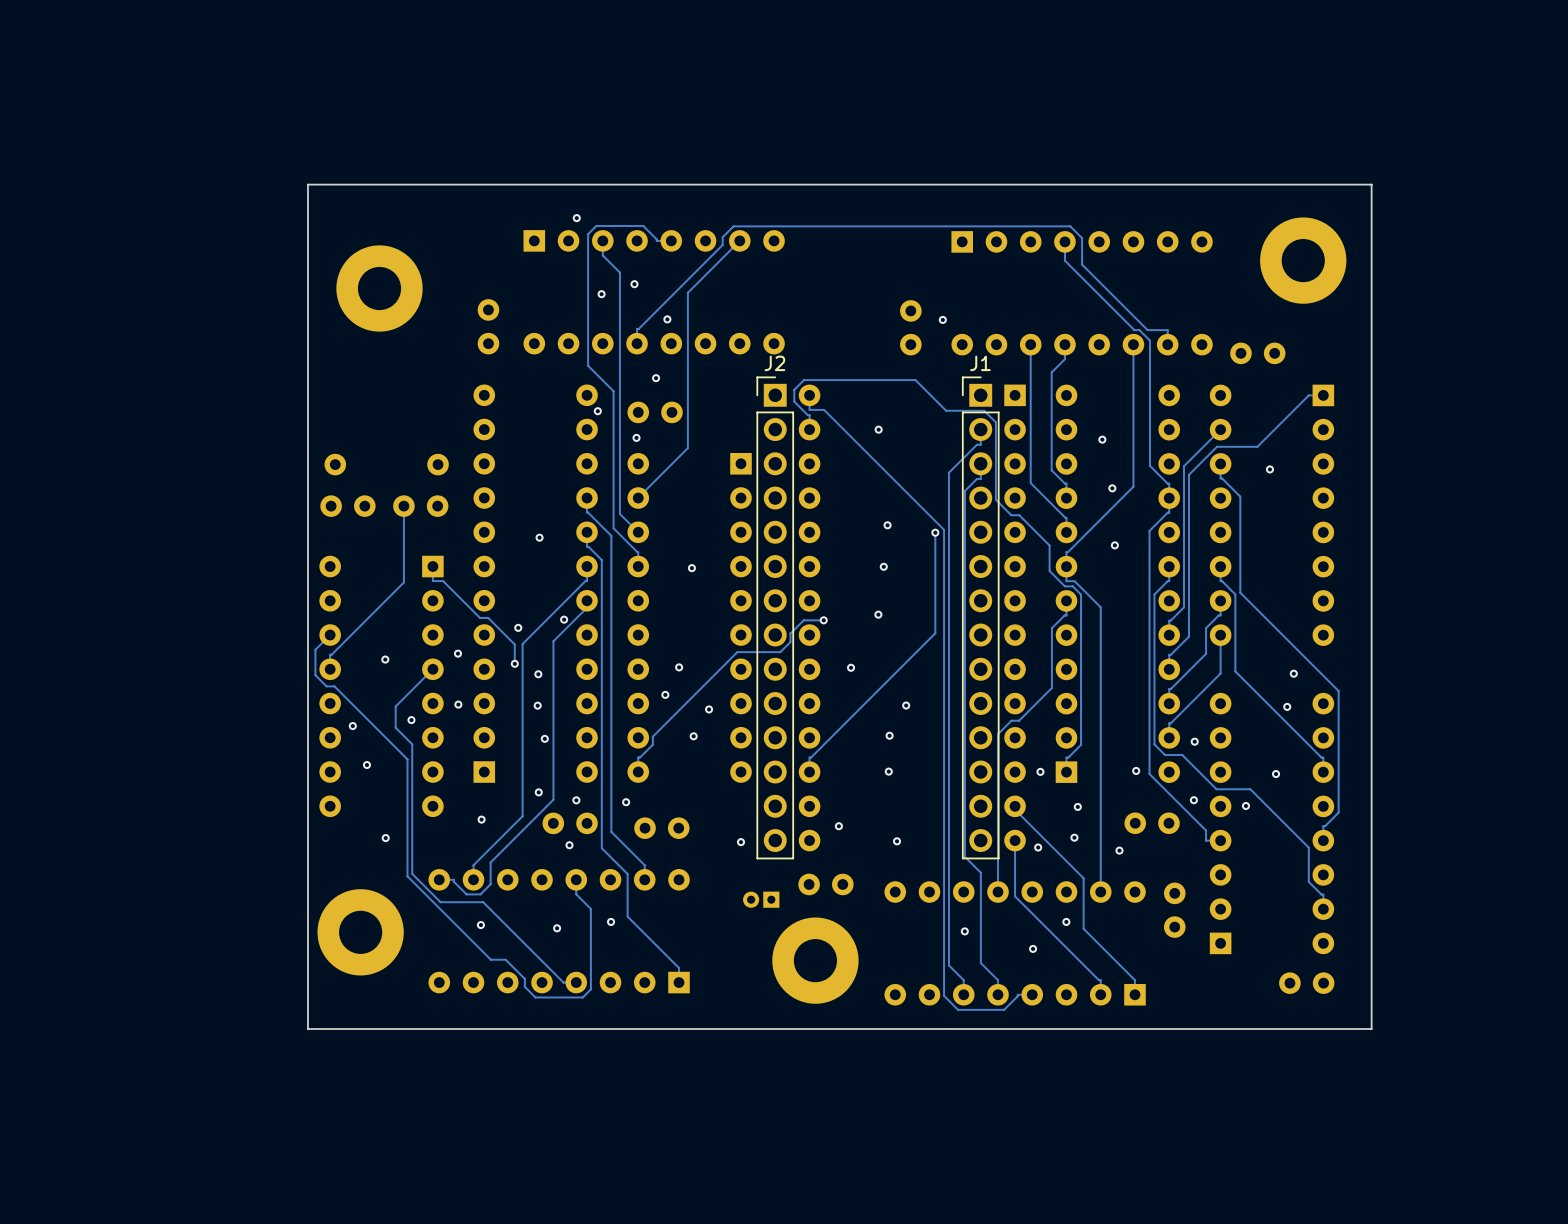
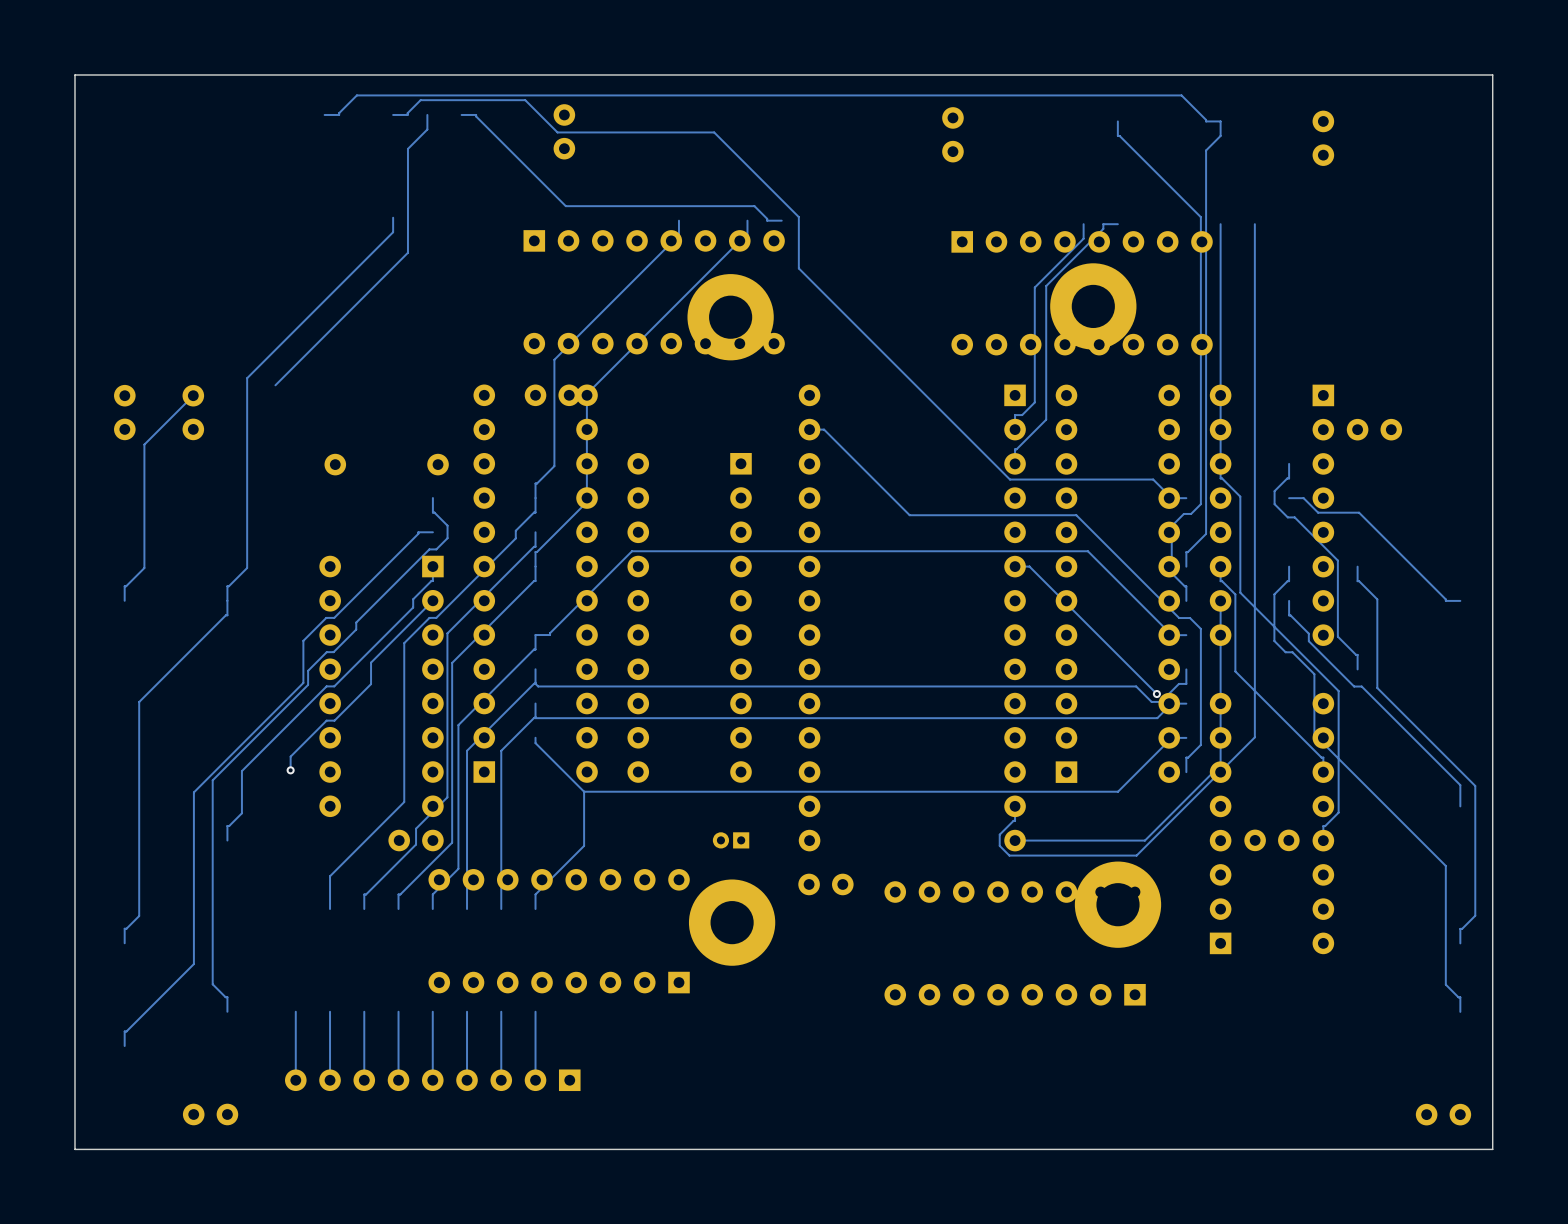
track: none -> (324, 114) (339, 114) (356, 95) (1181, 95) (1206, 121) (1220, 121) (1220, 135) (1206, 150) (1206, 533) (1186, 552) (1186, 566)
track: none -> (393, 114) (407, 114) (420, 100) (525, 100) (557, 132) (714, 132) (798, 217) (798, 268) (1009, 479) (1153, 479) (1171, 498) (1186, 498)
track: none -> (427, 114) (427, 129) (407, 148) (407, 252) (275, 385)
track: none -> (461, 114) (476, 114) (565, 206) (754, 206) (767, 220) (781, 220)
track: none -> (1117, 121) (1117, 135) (1200, 217) (1200, 504) (1191, 513) (1183, 513) (1171, 526) (1171, 573) (1186, 586) (1186, 600)
part: none -> (564, 131)
part: none -> (952, 134)
part: none -> (1323, 138)
board edge: (1371, 184) (307, 184) (307, 1029) (1371, 1029) (1371, 184) -> (1492, 74) (1492, 1149) (74, 1149) (74, 74) (1492, 74)
track: none -> (393, 217) (393, 232) (247, 378) (247, 568) (227, 586) (227, 615) (139, 702) (139, 916) (124, 928) (124, 943)
via: (576, 218) -> none
track: none -> (678, 220) (678, 235) (554, 359) (554, 466) (535, 483) (535, 512) (515, 530) (515, 538) (436, 617) (429, 617) (404, 643) (404, 802) (330, 876) (330, 909)
track: none -> (747, 220) (747, 235) (586, 393) (586, 502) (535, 552) (535, 581) (452, 662) (452, 842) (398, 894) (398, 909)
track: none -> (1083, 224) (1083, 238) (1034, 287) (1034, 402) (1022, 415) (1015, 415) (1015, 429)
track: none -> (1117, 224) (1103, 224) (1103, 228) (1046, 286) (1046, 419) (1015, 449) (1015, 463)
track: none -> (1220, 224) (1220, 463)
track: (602, 240) (602, 255) (619, 272) (619, 513) (638, 532) -> none
track: (671, 240) (656, 240) (643, 226) (596, 226) (588, 234) (588, 365) (613, 391) (613, 528) (638, 551) (638, 566) -> none
track: (739, 240) (687, 292) (687, 448) (638, 498) -> none
track: (1064, 241) (1064, 260) (1134, 330) (1139, 330) (1150, 340) (1150, 465) (1169, 483) (1169, 512) (1149, 530) (1149, 774) (1206, 830) (1206, 840) (1220, 840) -> none
part position: (1303, 260) -> (1093, 306)
via: (634, 284) -> none
part: (379, 288) -> none
via: (601, 294) -> none
part: none -> (730, 317)
via: (667, 319) -> none
via: (942, 319) -> none
part: (488, 326) -> none
part: (910, 327) -> none
track: (637, 343) (637, 329) (722, 244) (722, 237) (733, 226) (1070, 226) (1082, 238) (1082, 264) (1147, 330) (1167, 330) (1167, 344) -> none
track: (1030, 344) (1030, 483) (1066, 517) (1066, 532) -> none
track: (1064, 344) (1064, 359) (1051, 372) (1051, 470) (1066, 483) (1066, 498) -> none
track: (1133, 344) (1133, 486) (1066, 552) (1066, 581) (1074, 581) (1100, 607) (1100, 892) -> none
part: (1257, 353) -> none
via: (656, 378) -> none
track: none -> (193, 395) (144, 444) (144, 568) (124, 586) (124, 600)
part: none -> (552, 395)
track: (809, 395) (809, 409) (824, 409) (944, 529) (944, 995) (958, 1009) (1004, 1009) (1017, 994) (1032, 994) -> none
track: (1323, 395) (1308, 395) (1257, 446) (1217, 446) (1188, 474) (1188, 636) (1169, 654) (1169, 669) -> none
via: (597, 411) -> none
part: none -> (124, 412)
part: none -> (193, 412)
part: (655, 412) -> none
track: (809, 429) (809, 415) (794, 401) (794, 389) (804, 380) (915, 380) (946, 410) (984, 410) (995, 422) (995, 499) (1011, 515) -> (809, 429) (824, 429) (909, 515) (1011, 515)
via: (878, 429) -> none
track: (980, 429) (980, 444) (976, 444) (948, 472) (948, 965) (963, 980) (963, 994) -> none
track: (1220, 429) (1184, 466) (1184, 607) (1169, 620) (1169, 635) -> none
part: none -> (1374, 429)
via: (636, 437) -> none
via: (1102, 439) -> none
track: (980, 463) (980, 479) (976, 479) (964, 490) (964, 856) (980, 872) (980, 963) (997, 980) (997, 994) -> none
track: none -> (1289, 463) (1289, 478) (1274, 491) (1274, 504) (1287, 517) (1294, 517) (1337, 560) (1337, 636) (1357, 654) (1357, 669)
via: (1269, 469) -> none
via: (1112, 488) -> none
track: none -> (432, 498) (432, 512) (447, 525) (447, 538) (436, 549) (429, 549) (356, 622) (356, 629) (333, 652) (326, 652) (308, 670) (308, 684) (212, 780) (212, 984) (227, 997) (227, 1011)
track: (587, 498) (587, 512) (611, 535) (611, 831) (644, 865) (644, 879) -> none
track: none -> (1289, 498) (1303, 498) (1318, 512) (1359, 512) (1445, 600) (1460, 600)
part: (347, 506) -> none
track: (403, 506) (403, 582) (330, 654) (330, 669) -> none
part: (420, 506) -> none
track: (1019, 515) (1049, 545) (1049, 571) (1064, 586) (1072, 586) (1081, 594) (1081, 744) (1066, 757) (1066, 772) -> (1019, 515) (1076, 515) (1179, 618) (1190, 618) (1200, 628) (1200, 744) (1186, 757) (1186, 772)
via: (887, 525) -> none
track: none -> (432, 532) (418, 532) (334, 617) (326, 617) (303, 640) (303, 682) (193, 792) (193, 964) (124, 1031) (124, 1046)
track: none -> (535, 532) (535, 546) (447, 633) (447, 797) (416, 828) (416, 844) (364, 894) (364, 909)
track: (587, 532) (587, 546) (601, 560) (601, 848) (627, 874) (627, 916) (679, 968) (679, 982) -> none
track: (935, 532) (935, 633) (809, 757) (809, 772) -> none
via: (935, 532) -> none
via: (539, 537) -> none
via: (1114, 545) -> none
track: (587, 566) (587, 581) (522, 643) (522, 816) (473, 865) (473, 879) -> none
via: (883, 566) -> none
track: none -> (1015, 566) (1029, 566) (1156, 694)
track: (1169, 566) (1169, 581) (1154, 594) (1154, 744) (1165, 755) (1182, 755) (1216, 789) (1250, 789) (1308, 847) (1308, 881) (1323, 894) (1323, 909) -> none
track: none -> (1289, 566) (1289, 581) (1274, 594) (1274, 641) (1285, 652) (1292, 652) (1314, 674) (1314, 734) (1445, 865) (1445, 984) (1460, 997) (1460, 1011)
track: none -> (1357, 566) (1357, 581) (1377, 599) (1377, 688) (1475, 785) (1475, 915) (1460, 928) (1460, 943)
via: (691, 568) -> none
track: (432, 581) (443, 581) (479, 617) (488, 617) (514, 644) (514, 663) -> (432, 581) (413, 599) (413, 607) (334, 686)
track: none -> (432, 600) (371, 662) (371, 684) (334, 720) (326, 720) (290, 756) (290, 770)
track: (587, 600) (587, 607) (553, 641) (553, 799) (490, 862) (490, 884) (480, 894) (466, 894) (453, 879) (439, 879) -> none
track: (1066, 600) (1066, 615) (1051, 628) (1051, 687) (1019, 720) (1011, 720) (997, 734) (997, 892) -> none
track: none -> (1289, 600) (1289, 615) (1308, 633) (1308, 641) (1354, 686) (1361, 686) (1460, 785) (1460, 806)
via: (878, 614) -> none
track: (1220, 615) (1206, 628) (1206, 653) (1169, 689) (1169, 703) -> (1220, 615) (1220, 635)
J2: (775, 617) -> none
J1: (980, 617) -> none
via: (564, 619) -> none
track: (823, 620) (803, 620) (790, 633) (790, 642) (780, 652) (737, 652) (652, 736) (652, 744) (638, 757) (638, 772) -> none
via: (823, 620) -> none
via: (518, 627) -> none
track: (330, 635) (315, 649) (315, 675) (326, 686) -> (227, 840) (227, 825) (241, 813) (241, 771) (326, 686)
track: none -> (1186, 635) (1171, 635) (1087, 551) (631, 551) (550, 635) (535, 635) (535, 649) (458, 725) (458, 868) (432, 894) (432, 909)
via: (457, 653) -> none
via: (385, 659) -> none
via: (514, 663) -> none
via: (679, 667) -> none
via: (851, 667) -> none
track: (432, 669) (395, 706) (395, 727) (412, 744) (412, 873) (440, 902) (483, 902) (563, 982) (576, 982) -> none
track: none -> (535, 669) (535, 683)
track: none -> (1186, 669) (1186, 683) (1178, 683) (1160, 701) (1151, 701) (1136, 686) (538, 686) (535, 683)
track: (1220, 673) (1169, 723) (1169, 737) -> (1220, 673) (1220, 764) (1144, 840) (1015, 840)
via: (1293, 673) -> none
via: (538, 674) -> none
track: none -> (535, 683) (467, 750) (467, 909)
track: (334, 686) (407, 759) (407, 876) (490, 959) (505, 959) (524, 978) (524, 986) (535, 997) (582, 997) (590, 989) (590, 909) (576, 894) (576, 879) -> none
via: (665, 694) -> none
via: none -> (1156, 694)
track: none -> (535, 703) (535, 718) (501, 750) (501, 909)
track: none -> (1186, 703) (1171, 703) (1157, 718) (535, 718)
via: (458, 704) -> none
via: (537, 705) -> none
via: (906, 705) -> none
via: (1287, 706) -> none
via: (709, 709) -> none
via: (411, 720) -> none
via: (352, 726) -> none
via: (889, 735) -> none
via: (693, 736) -> none
track: none -> (535, 737) (535, 743) (584, 791)
track: none -> (1186, 737) (1171, 737) (1118, 791) (584, 791)
via: (544, 738) -> none
via: (1194, 741) -> none
via: (366, 765) -> none
via: none -> (290, 770)
via: (1136, 770) -> none
via: (888, 771) -> none
via: (1040, 771) -> none
via: (1276, 774) -> none
track: none -> (584, 791) (584, 845) (535, 894) (535, 909)
via: (538, 792) -> none
via: (576, 800) -> none
via: (1193, 800) -> none
via: (626, 802) -> none
via: (1245, 805) -> none
via: (1077, 806) -> none
track: (1015, 809) (1083, 878) (1083, 928) (1134, 980) (1134, 994) -> (1015, 809) (1015, 820) (999, 834) (999, 845) (1009, 855) (1136, 855) (1254, 737) (1254, 224)
via: (481, 819) -> none
part: (570, 823) -> none
part: (1152, 823) -> none
via: (838, 826) -> none
part: (661, 828) -> none
via: (1074, 837) -> none
via: (385, 838) -> none
part: none -> (416, 840)
track: (1015, 840) (1015, 896) (1100, 980) (1100, 994) -> none
part: none -> (1271, 840)
via: (897, 841) -> none
via: (741, 842) -> none
via: (569, 845) -> none
via: (1038, 847) -> none
via: (1119, 850) -> none
part position: (761, 899) -> (731, 840)
part: none -> (1118, 904)
part: (1174, 910) -> none
via: (611, 921) -> none
via: (1066, 921) -> none
via: (480, 925) -> none
via: (557, 928) -> none
via: (964, 931) -> none
part: (360, 932) -> none
via: (1033, 948) -> none
part position: (815, 960) -> (732, 922)
part: (1306, 983) -> none
track: none -> (295, 1011) (295, 1080)
track: none -> (330, 1011) (330, 1080)
track: none -> (364, 1011) (364, 1080)
track: none -> (398, 1011) (398, 1080)
track: none -> (432, 1011) (432, 1080)
track: none -> (467, 1011) (467, 1080)
track: none -> (501, 1011) (501, 1080)
track: none -> (535, 1011) (535, 1080)
part: none -> (432, 1080)
part: none -> (210, 1114)
part: none -> (1443, 1114)

